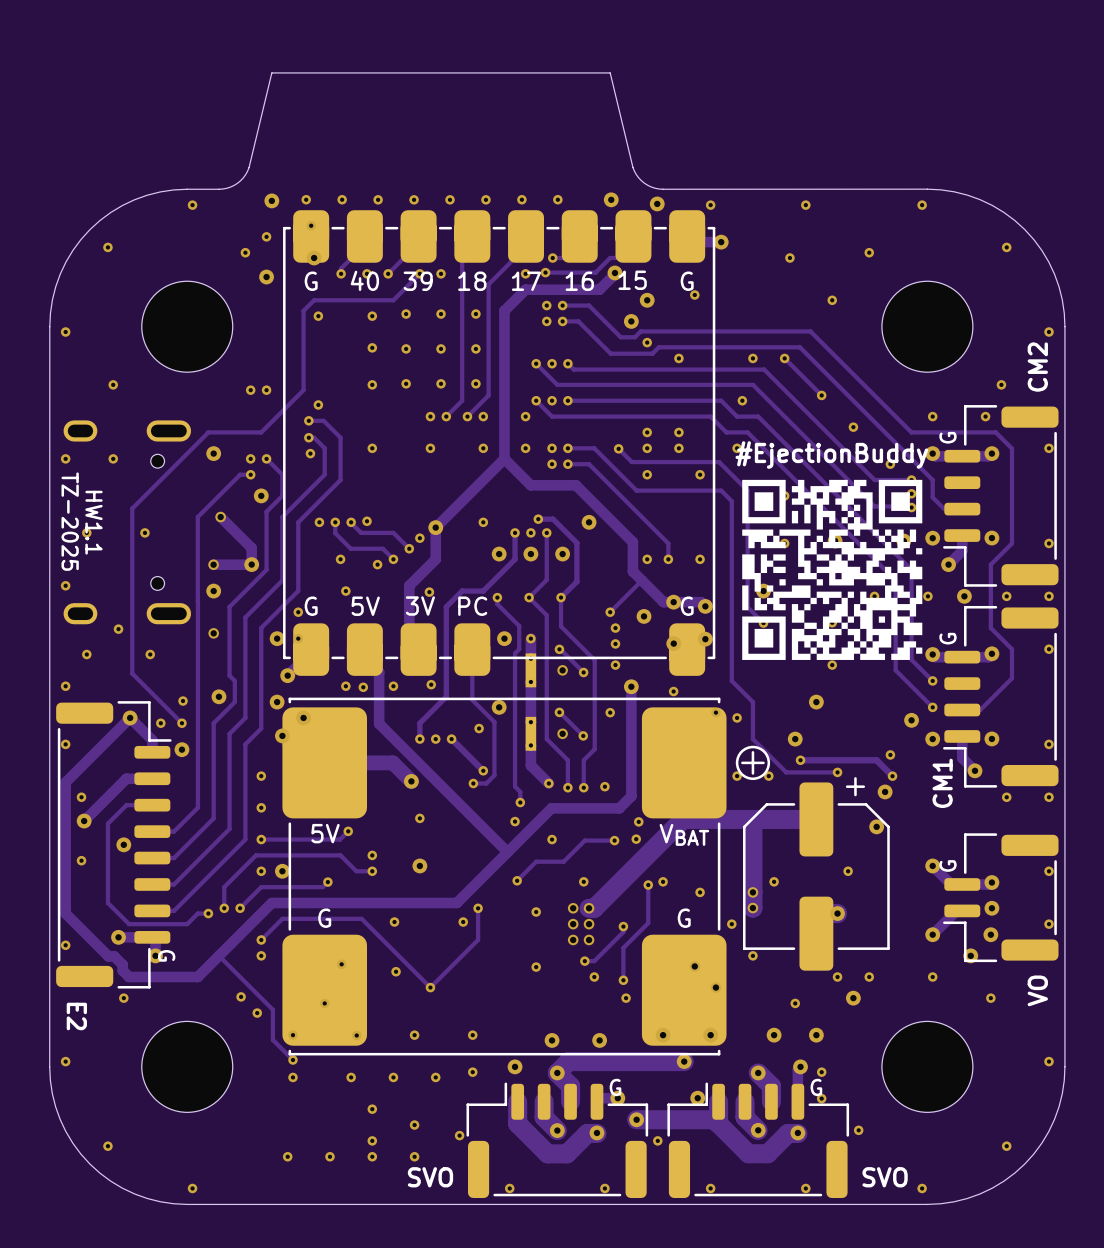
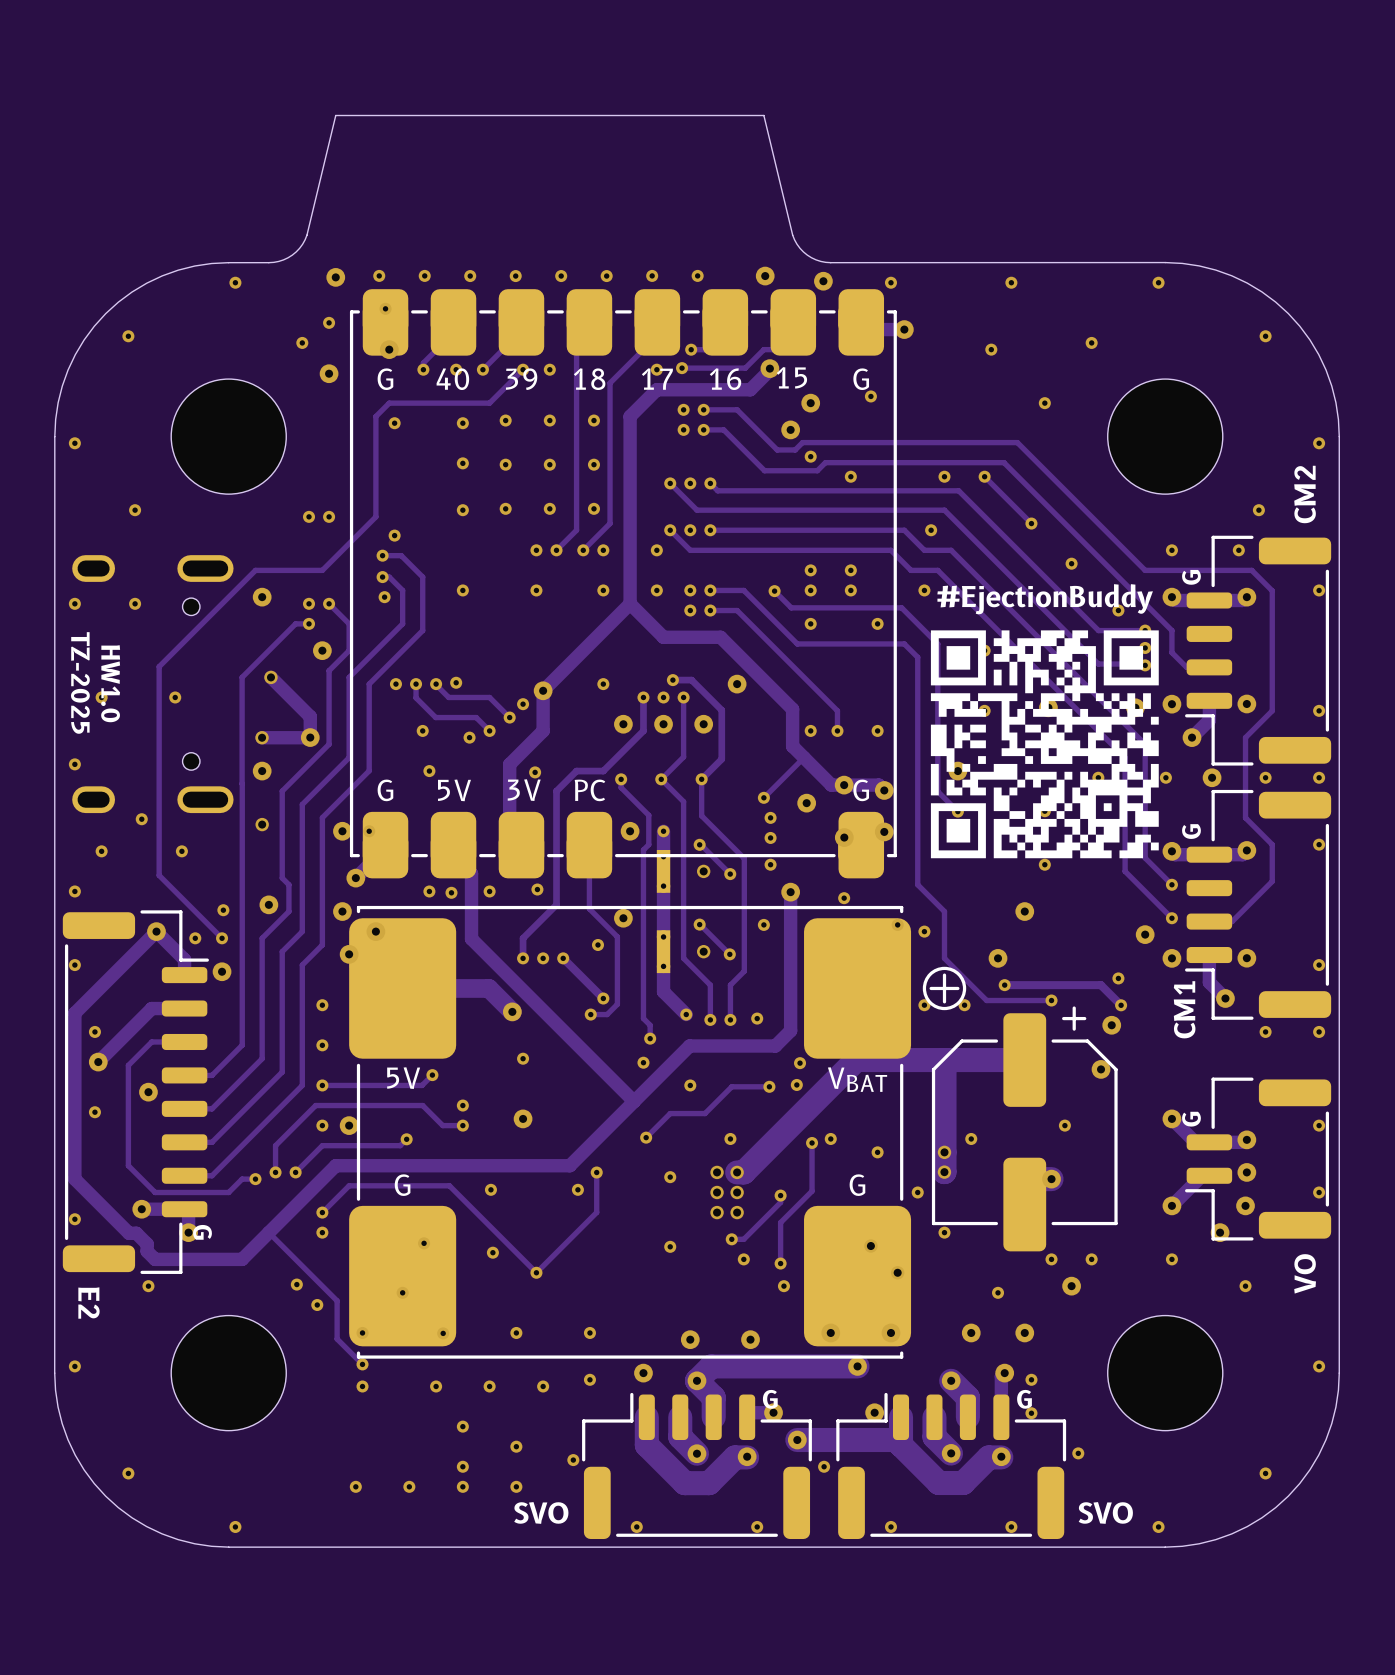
text: HW1.1 (93, 522) -> HW1.0 (110, 683)
via: (298, 612) -> none

